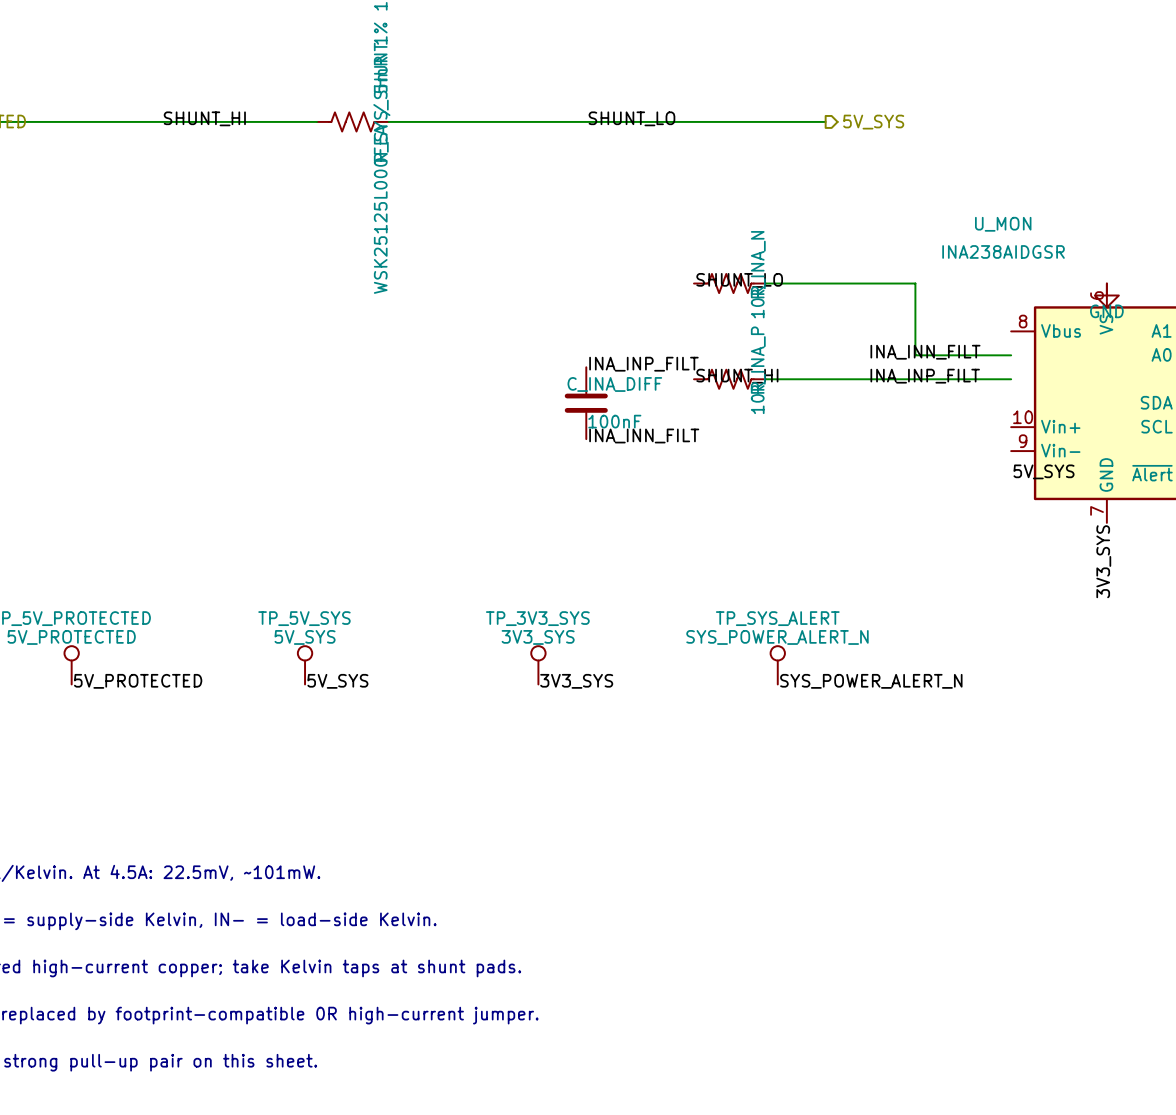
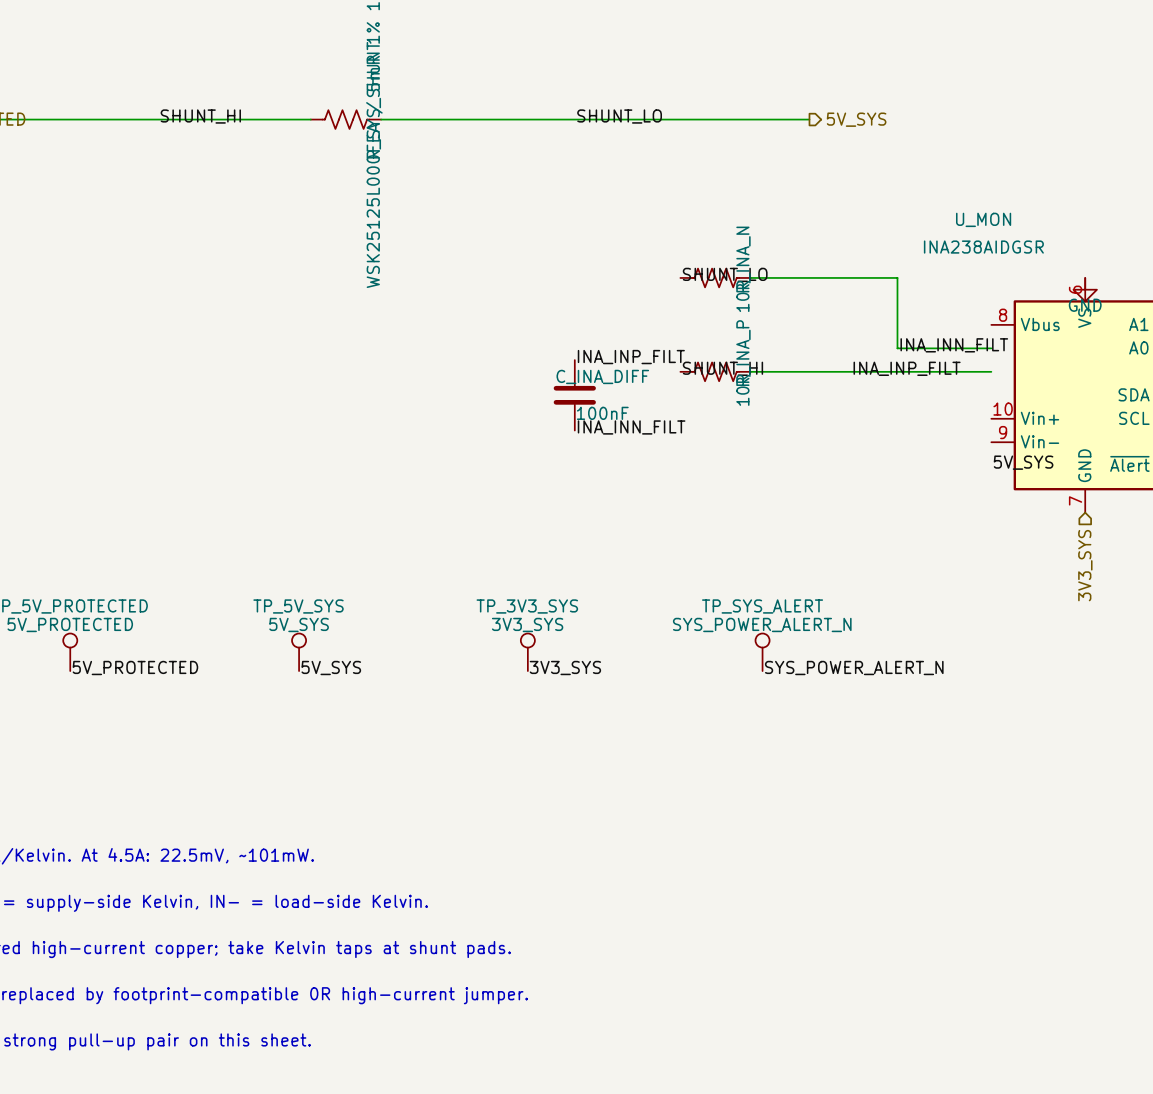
label position: INA_INN_FILT (925, 352) -> INA_INN_FILT (954, 345)
label: 3V3_SYS (1103, 561) -> none
hierarchical label: none -> 3V3_SYS (1085, 565)

